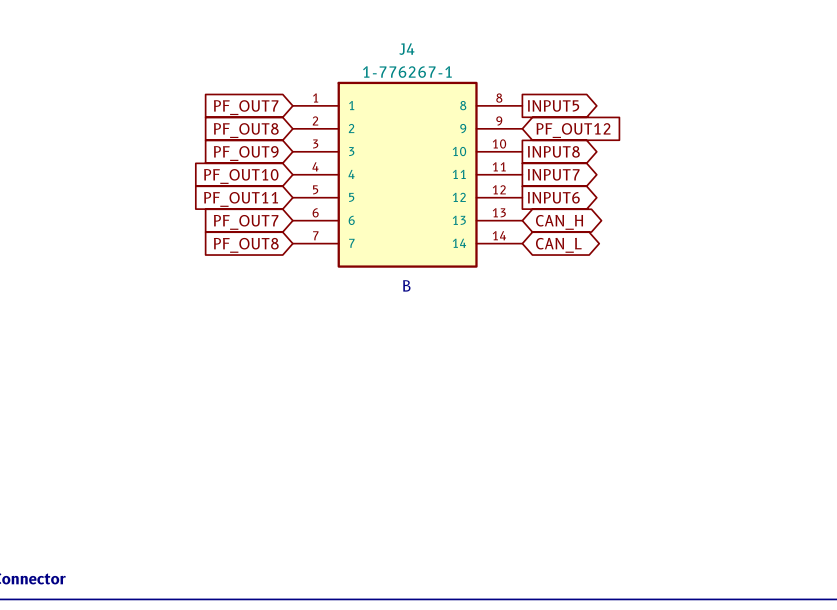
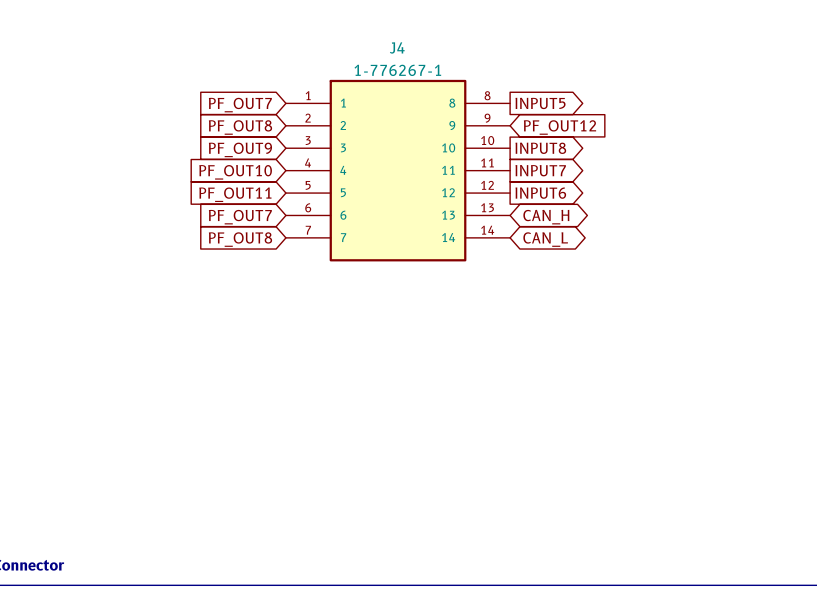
text: B (406, 285) -> none

